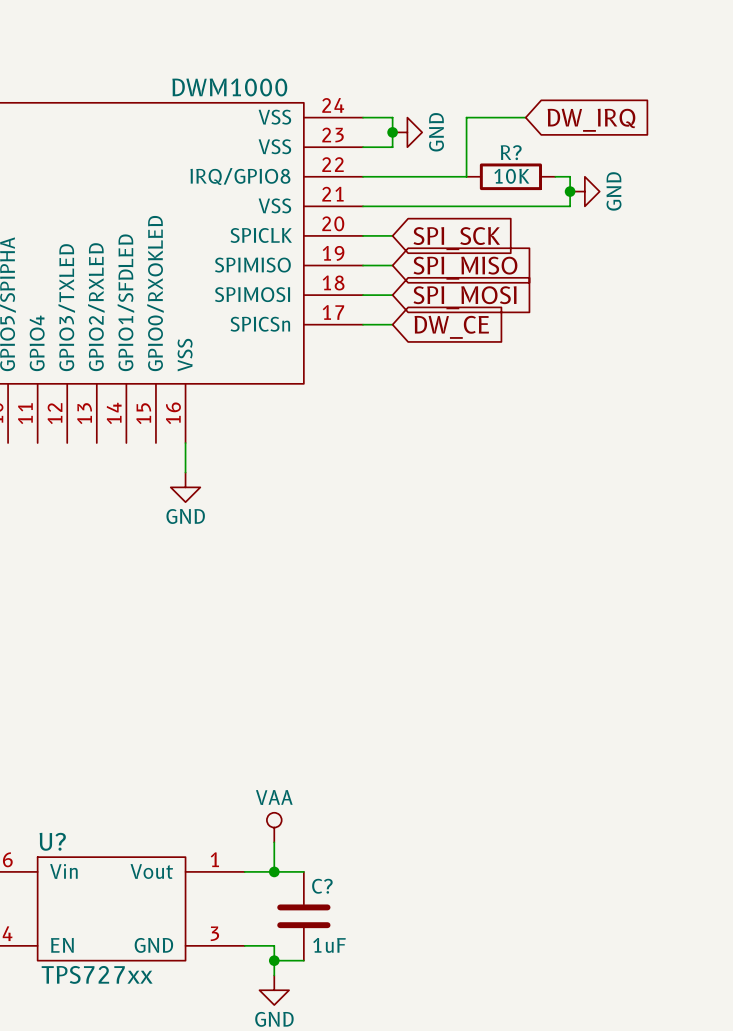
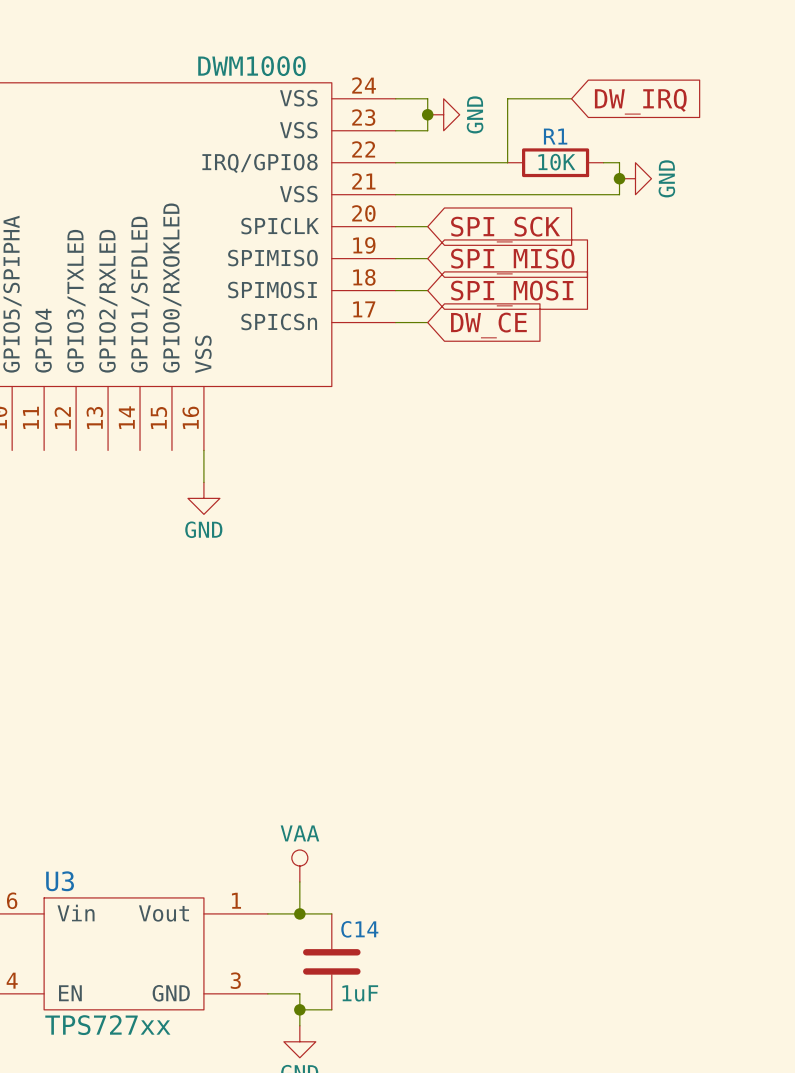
R? name: R? (511, 152) -> R1 (555, 136)
U? name: U? (52, 841) -> U3 (60, 881)
C? name: C? (322, 886) -> C14 (359, 929)

